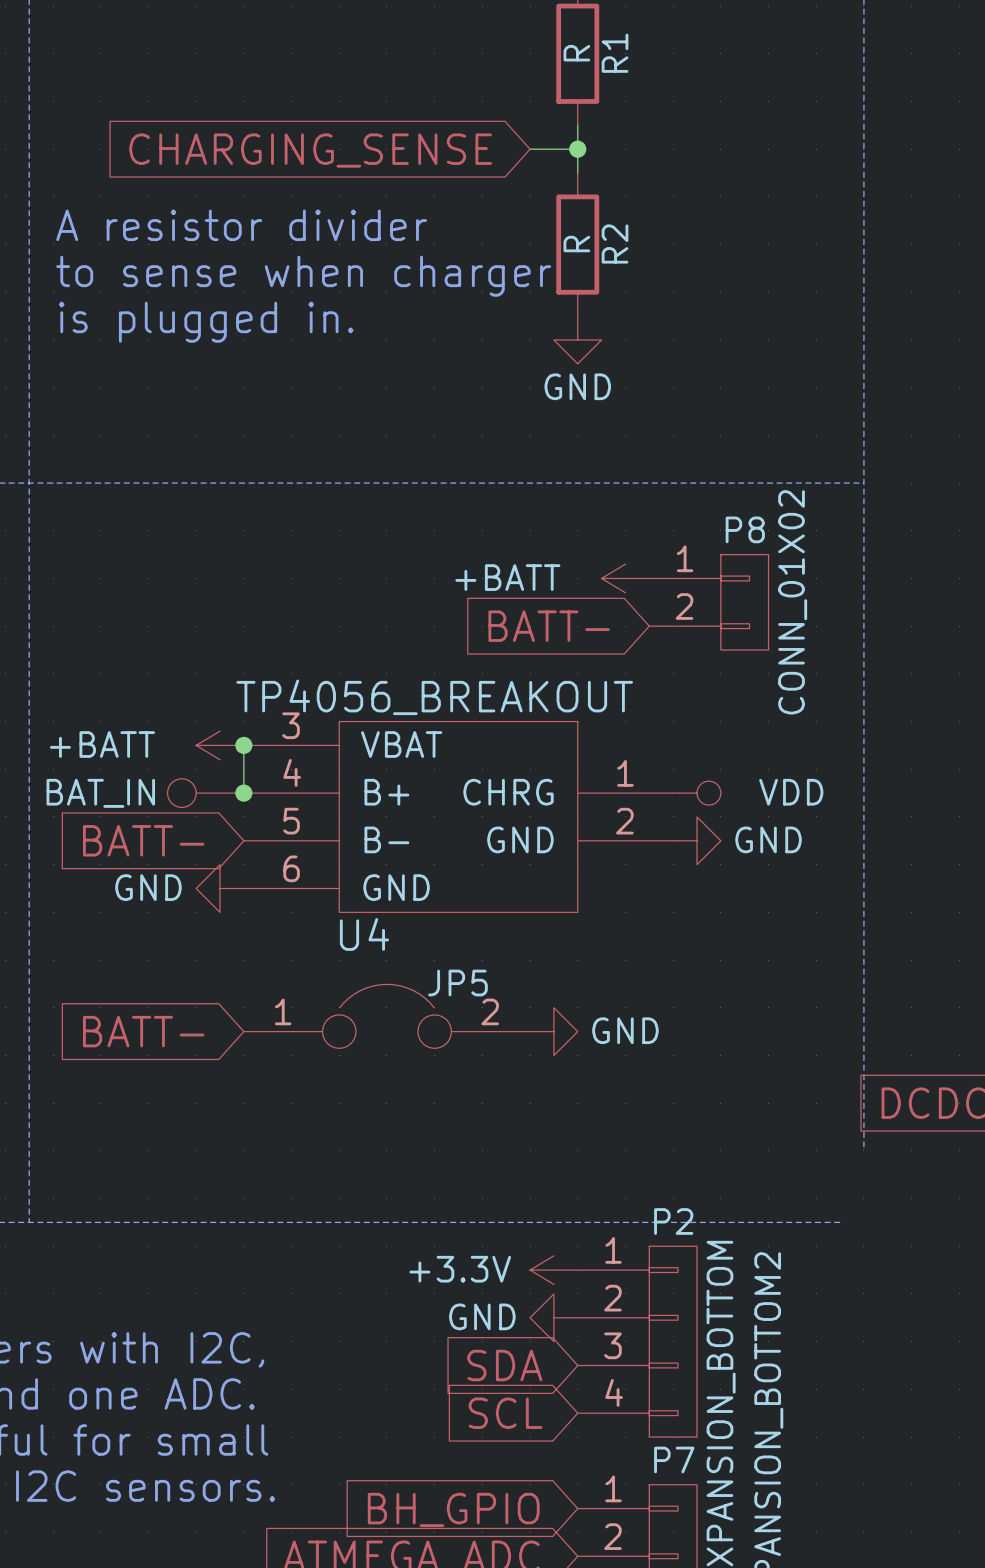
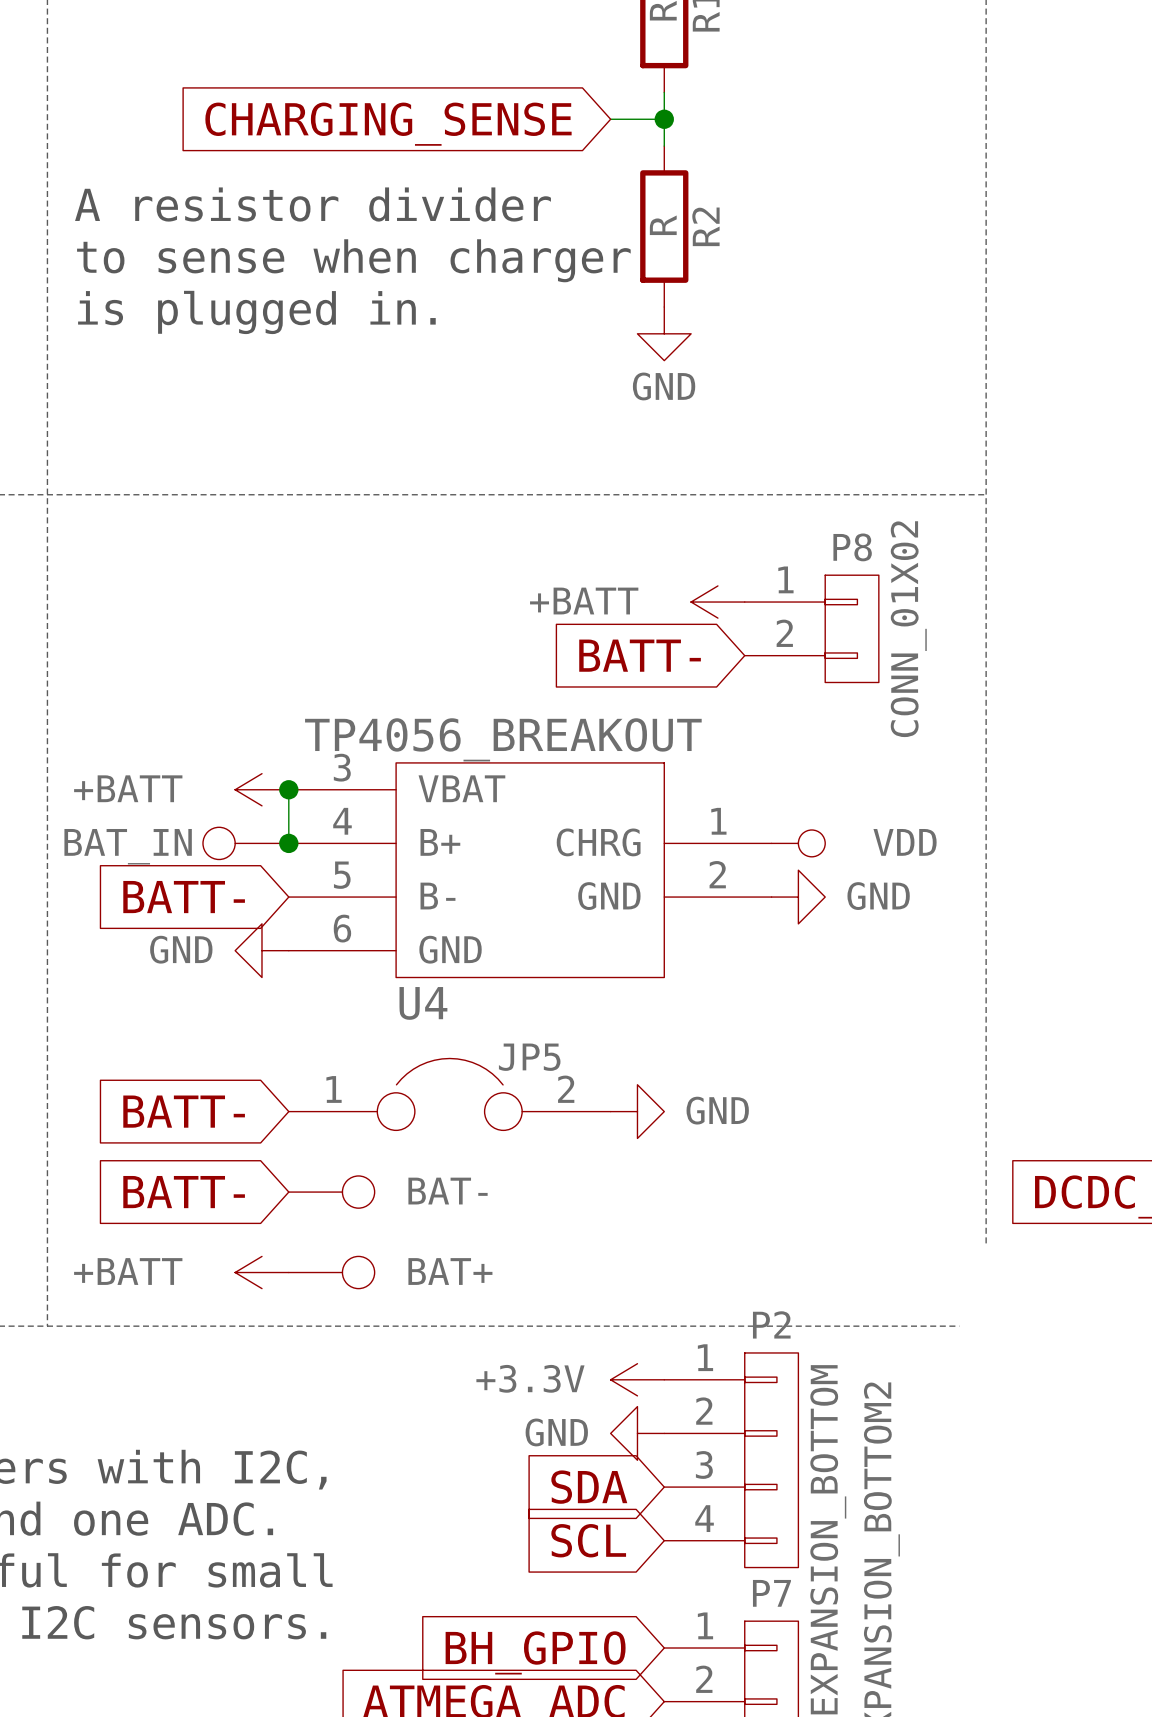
global label: none -> BATT- (184, 1192)
part: none -> BAT- (331, 1192)
power symbol: none -> +BATT (261, 1272)
part: none -> BAT+ (331, 1272)

